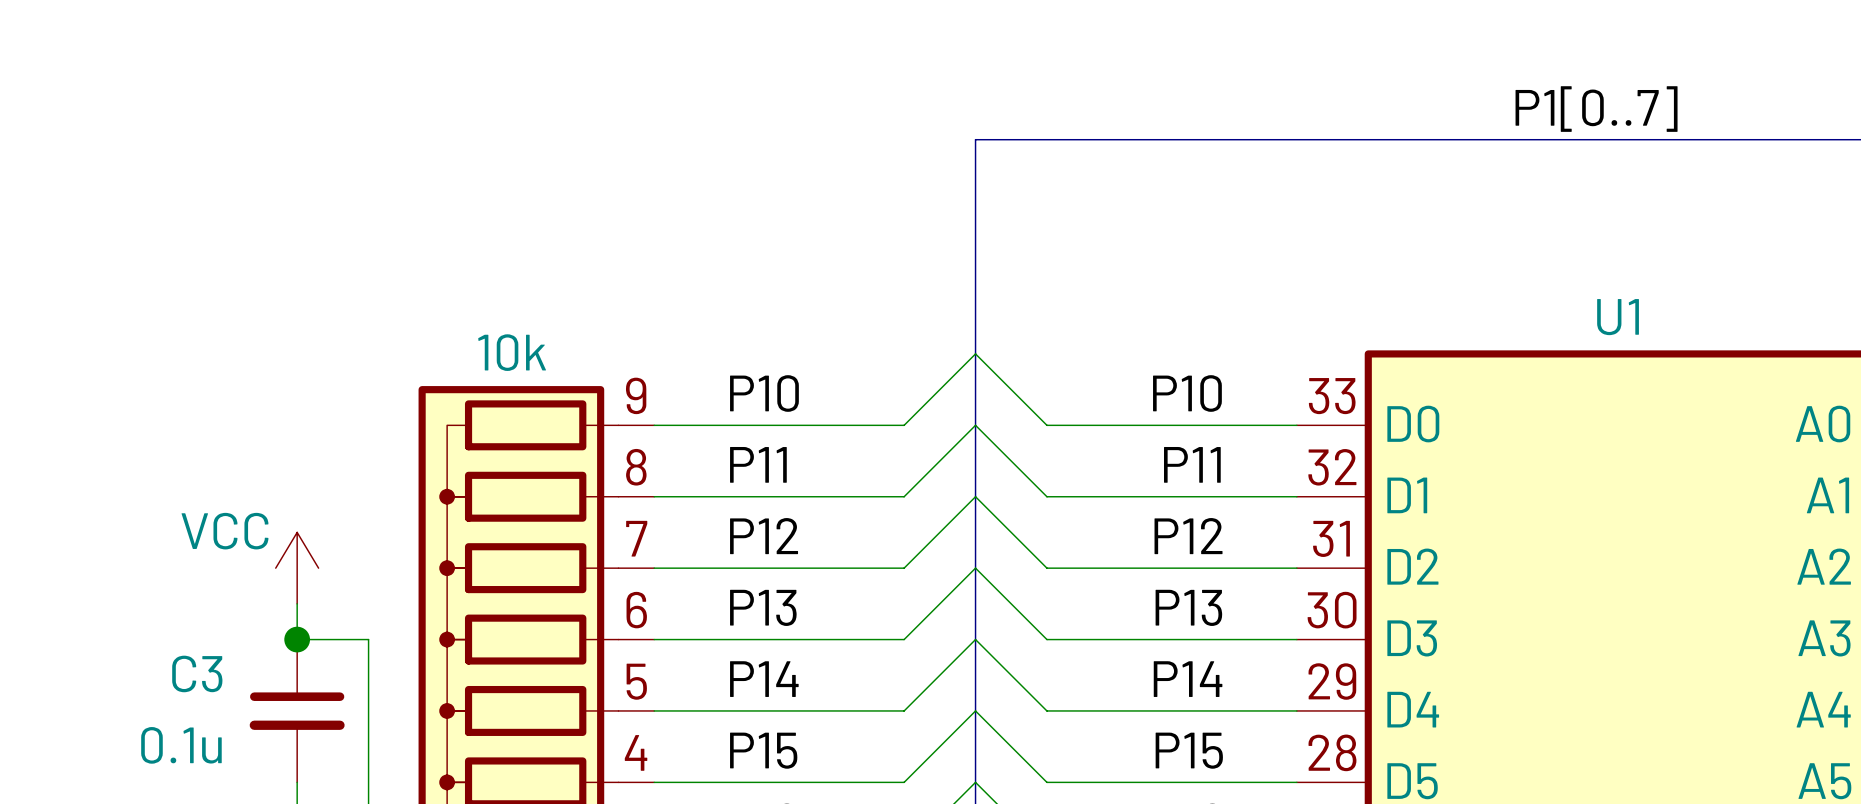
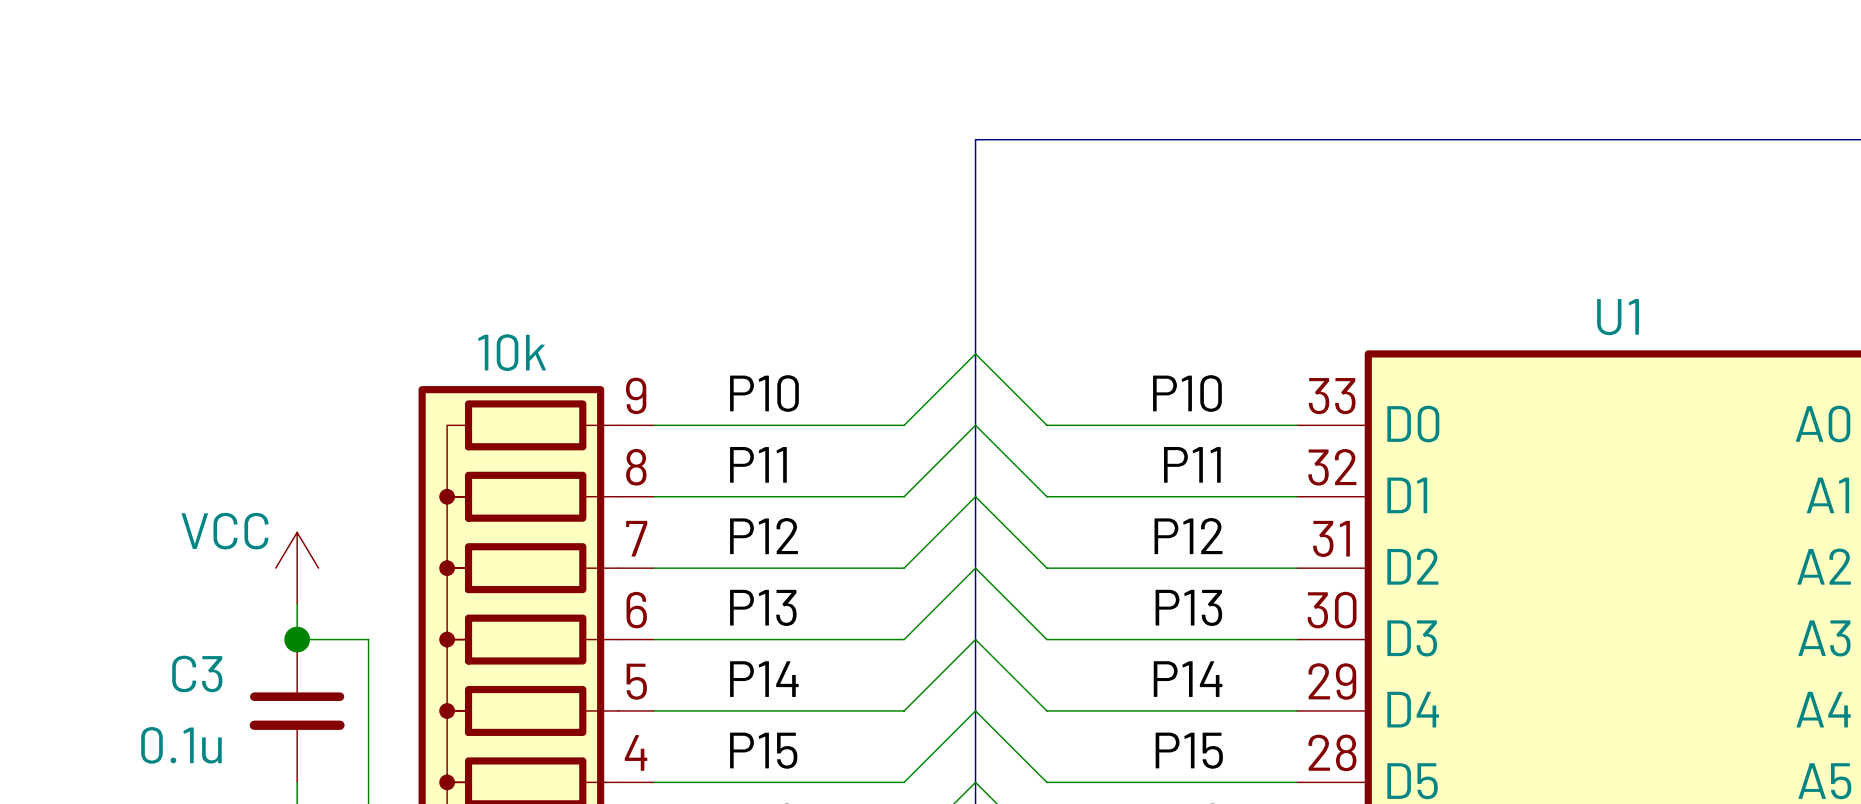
label: P1[0..7] (1596, 109) -> none

